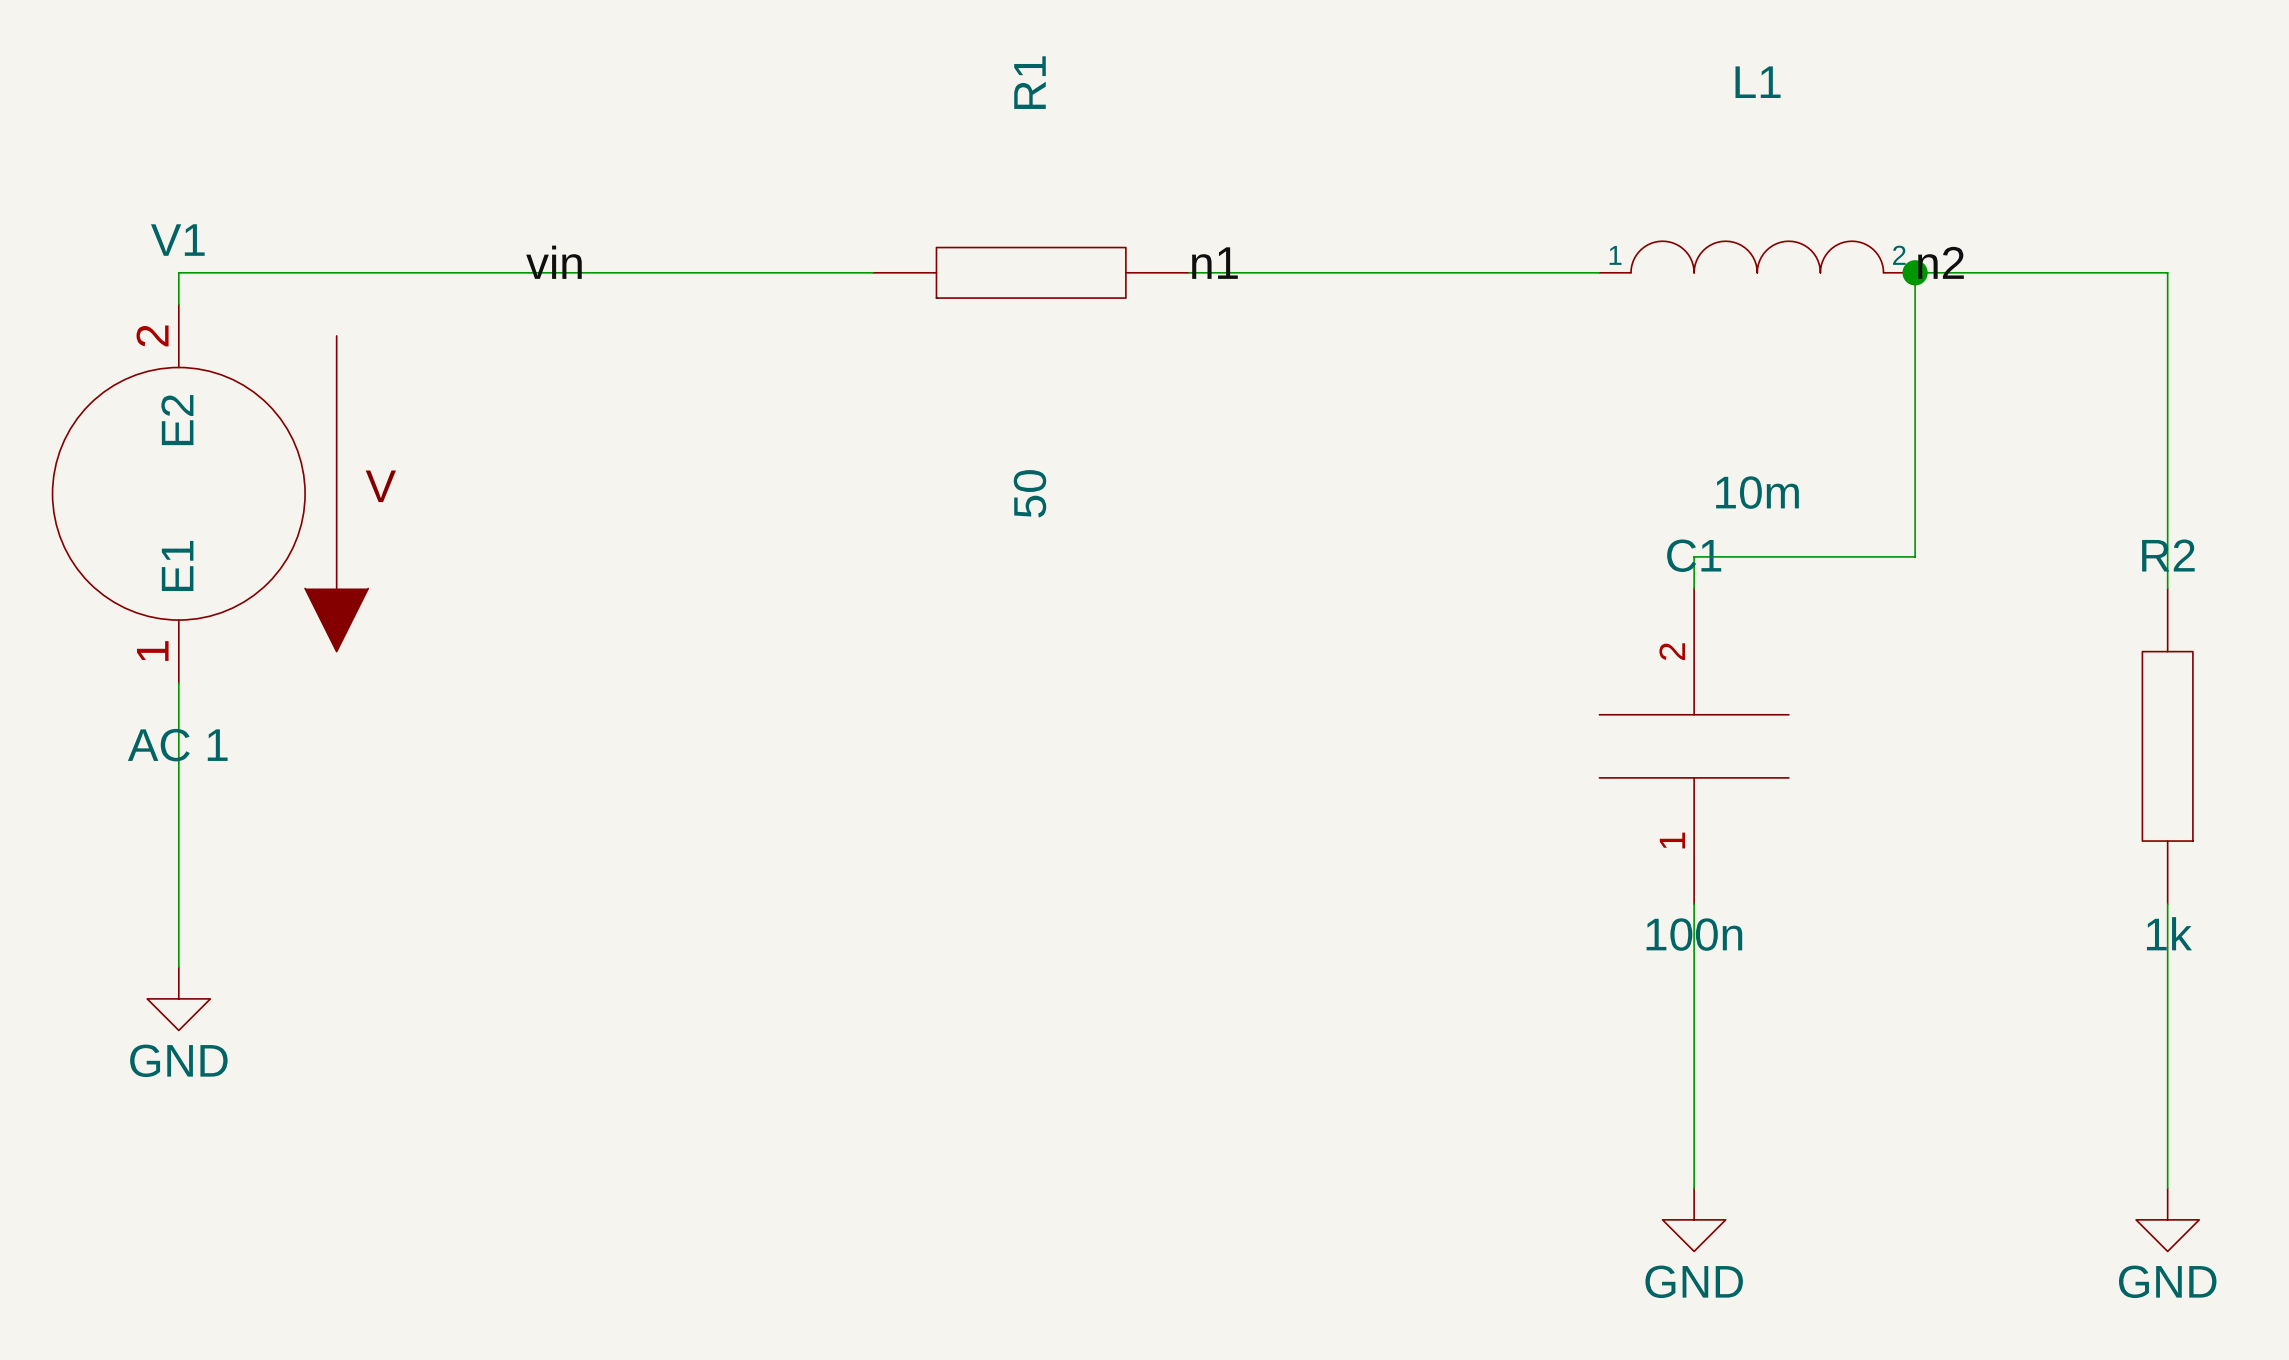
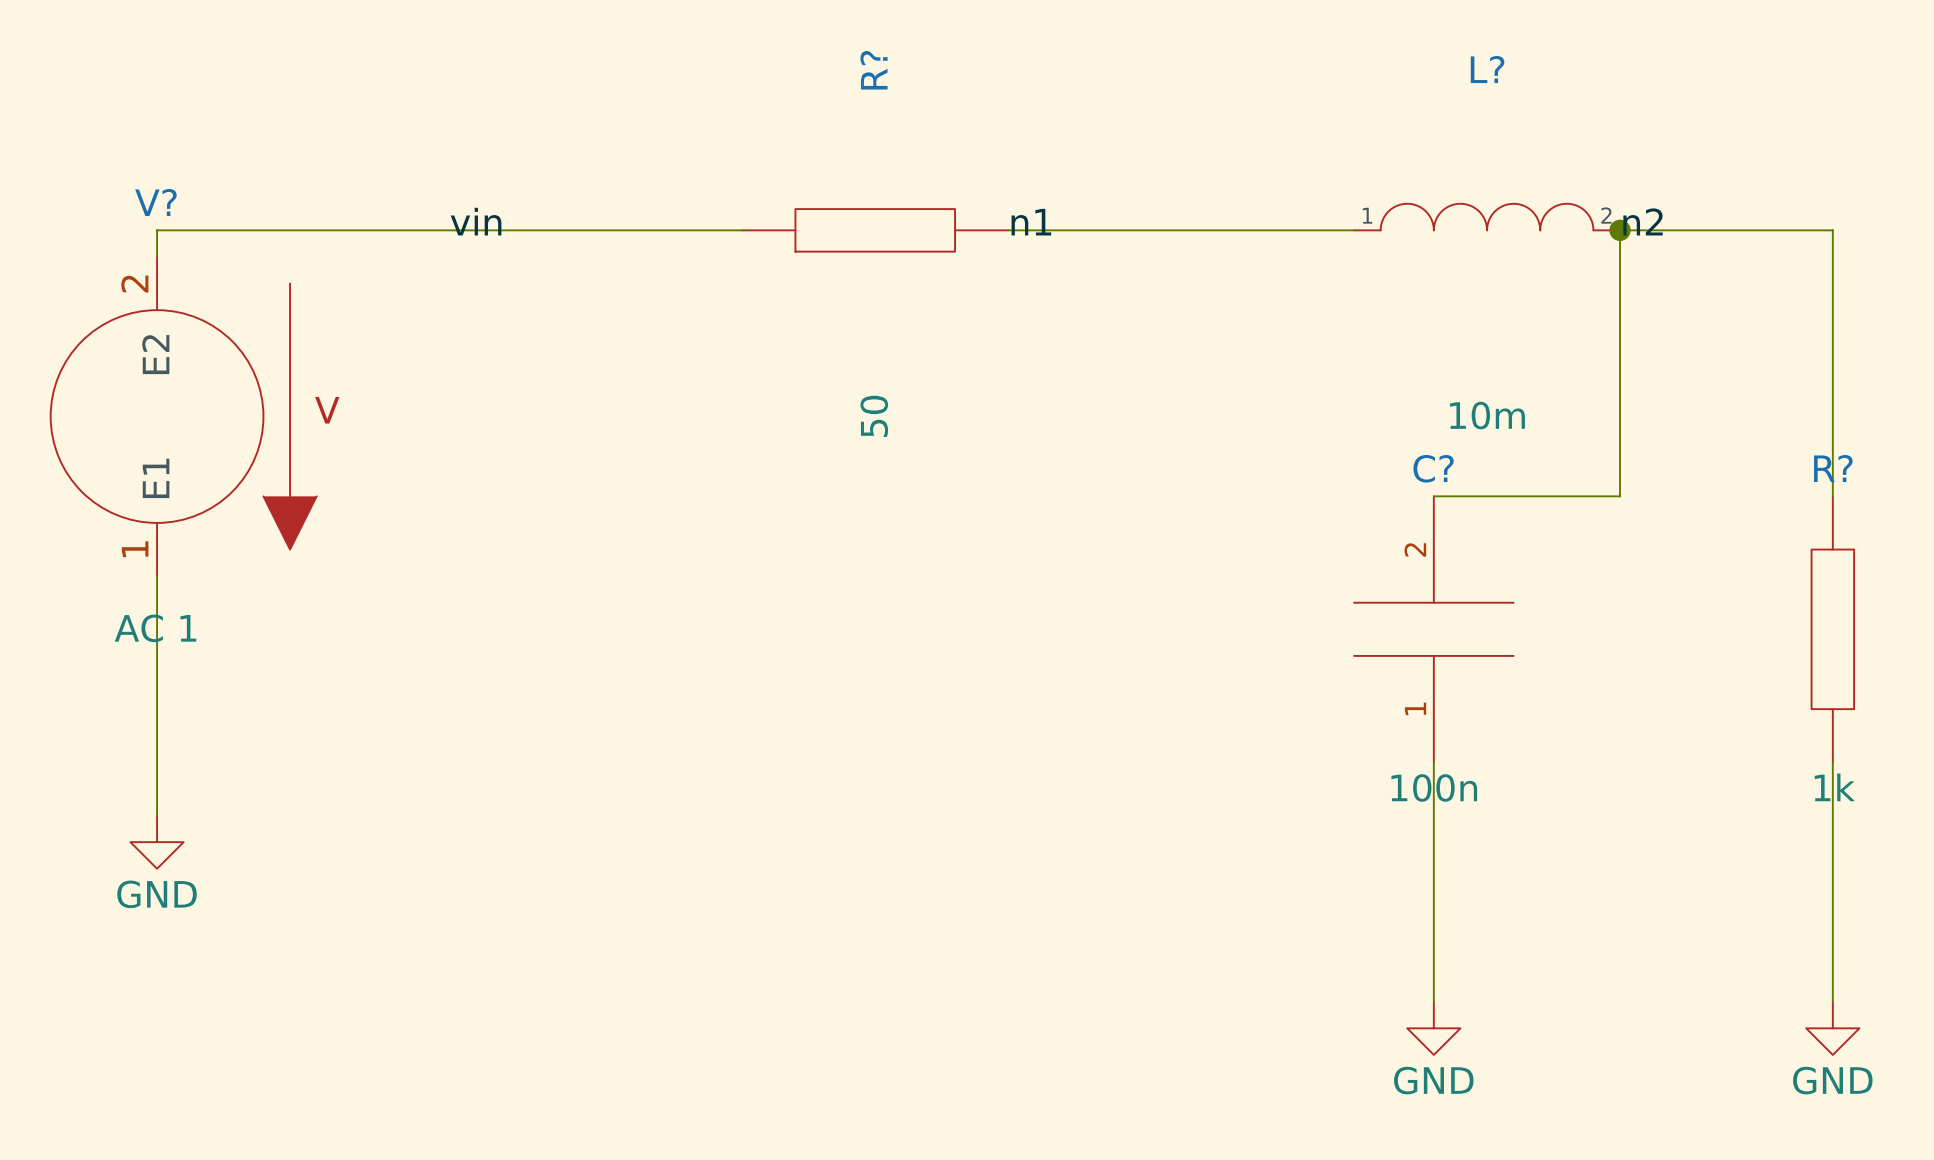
R1 name: R1 (1029, 82) -> R? (874, 70)
L1 name: L1 (1758, 82) -> L? (1487, 69)
V1 name: V1 (177, 240) -> V? (155, 202)
C1 name: C1 (1694, 555) -> C? (1433, 468)
R2 name: R2 (2168, 555) -> R? (1833, 468)
wire: (1915, 556) (1694, 556) (1694, 588) -> (1620, 469) (1620, 496) (1433, 496)

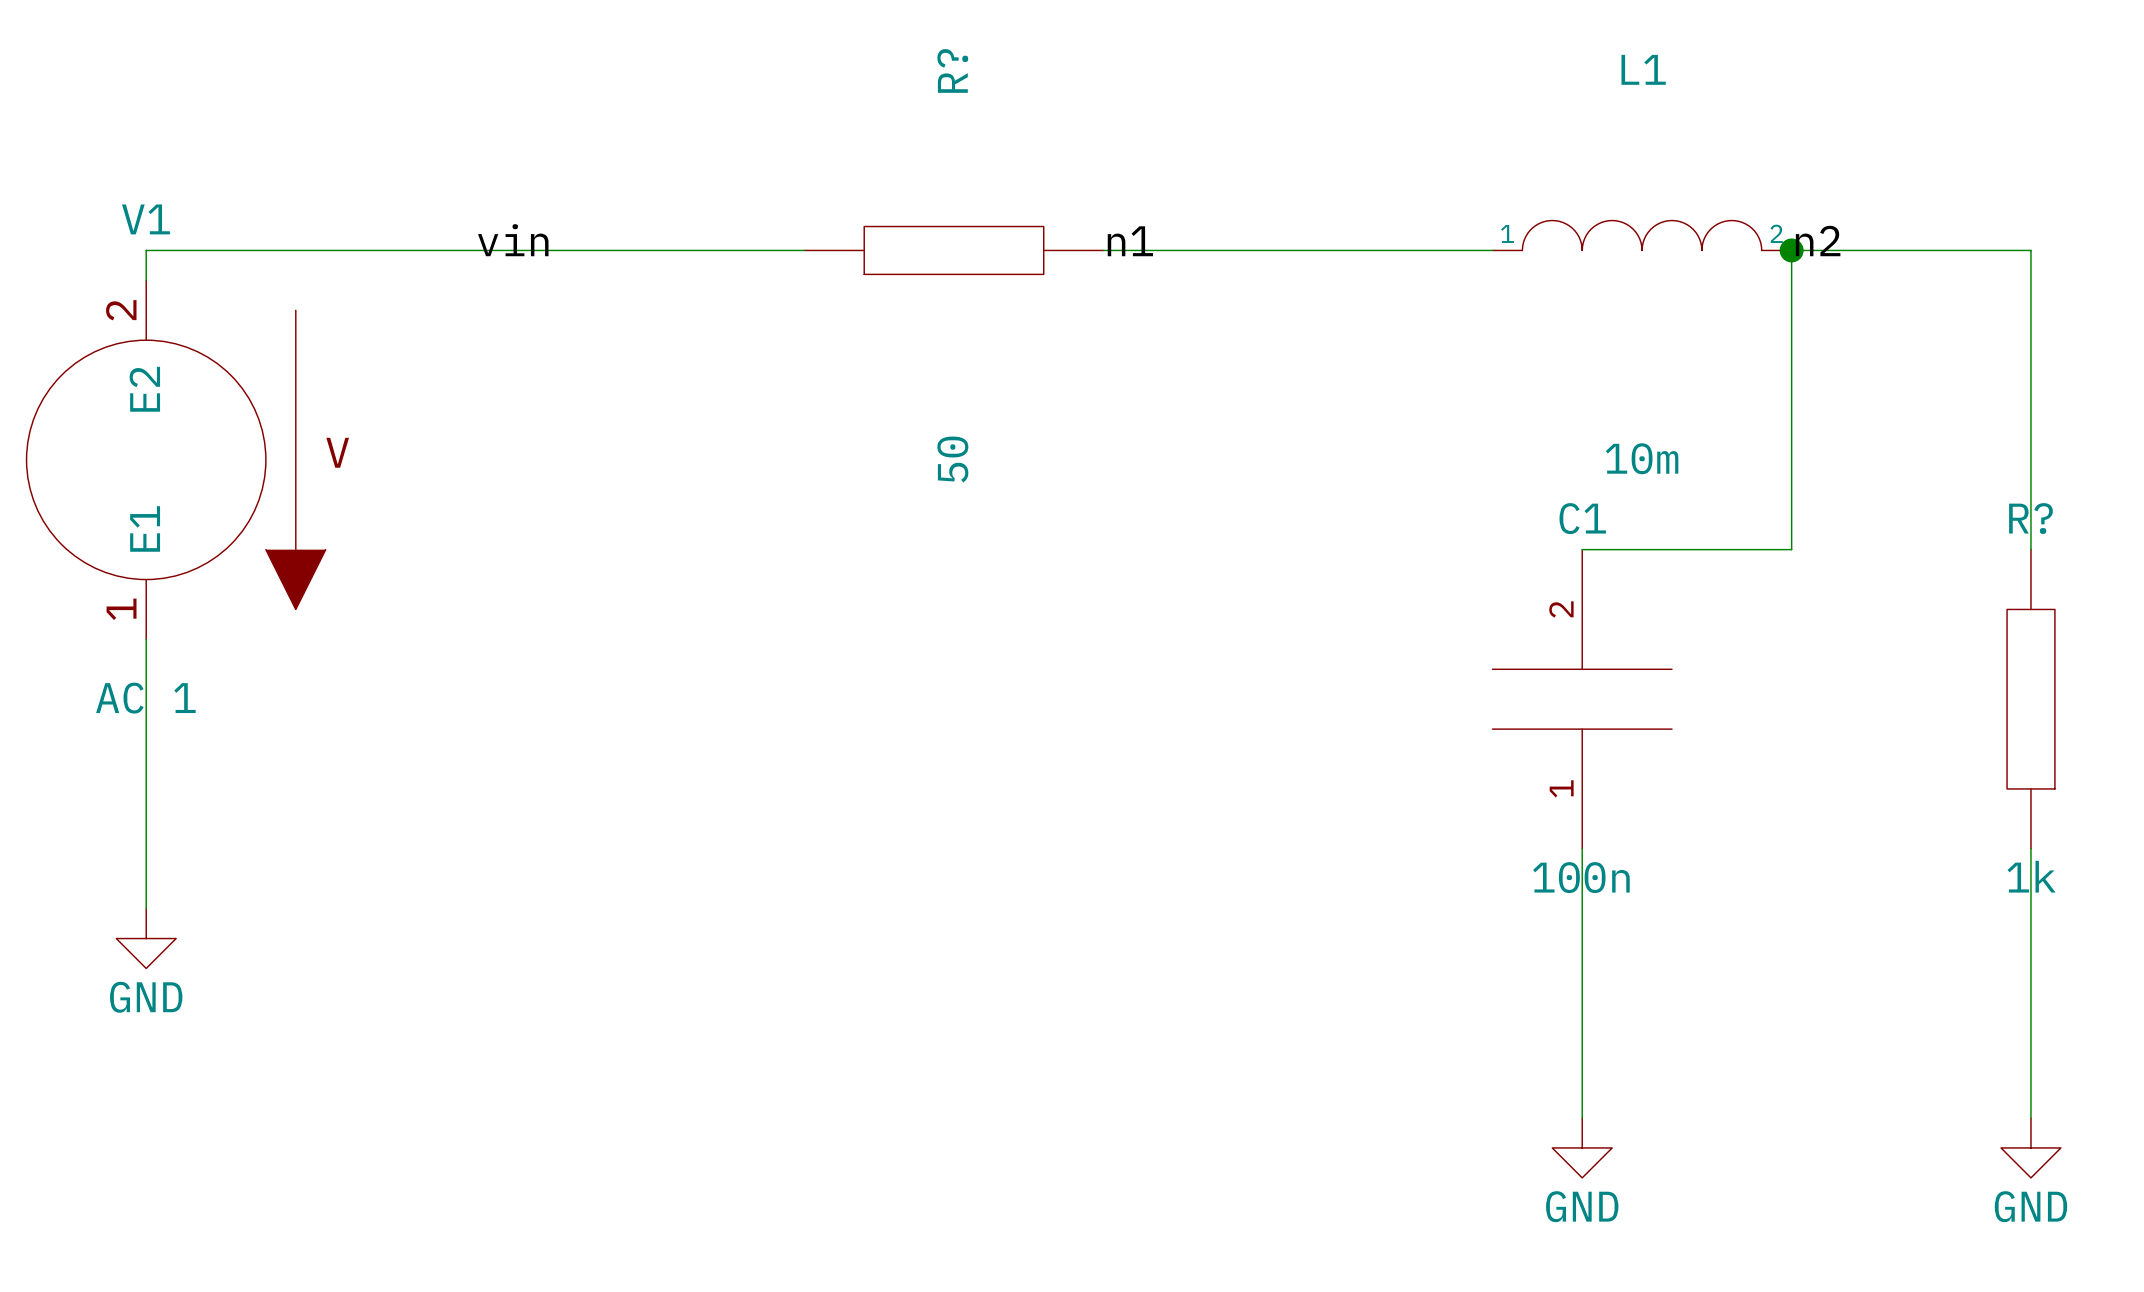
L? name: L? (1487, 69) -> L1 (1643, 69)
V? name: V? (155, 202) -> V1 (145, 219)
C? name: C? (1433, 468) -> C1 (1582, 518)

